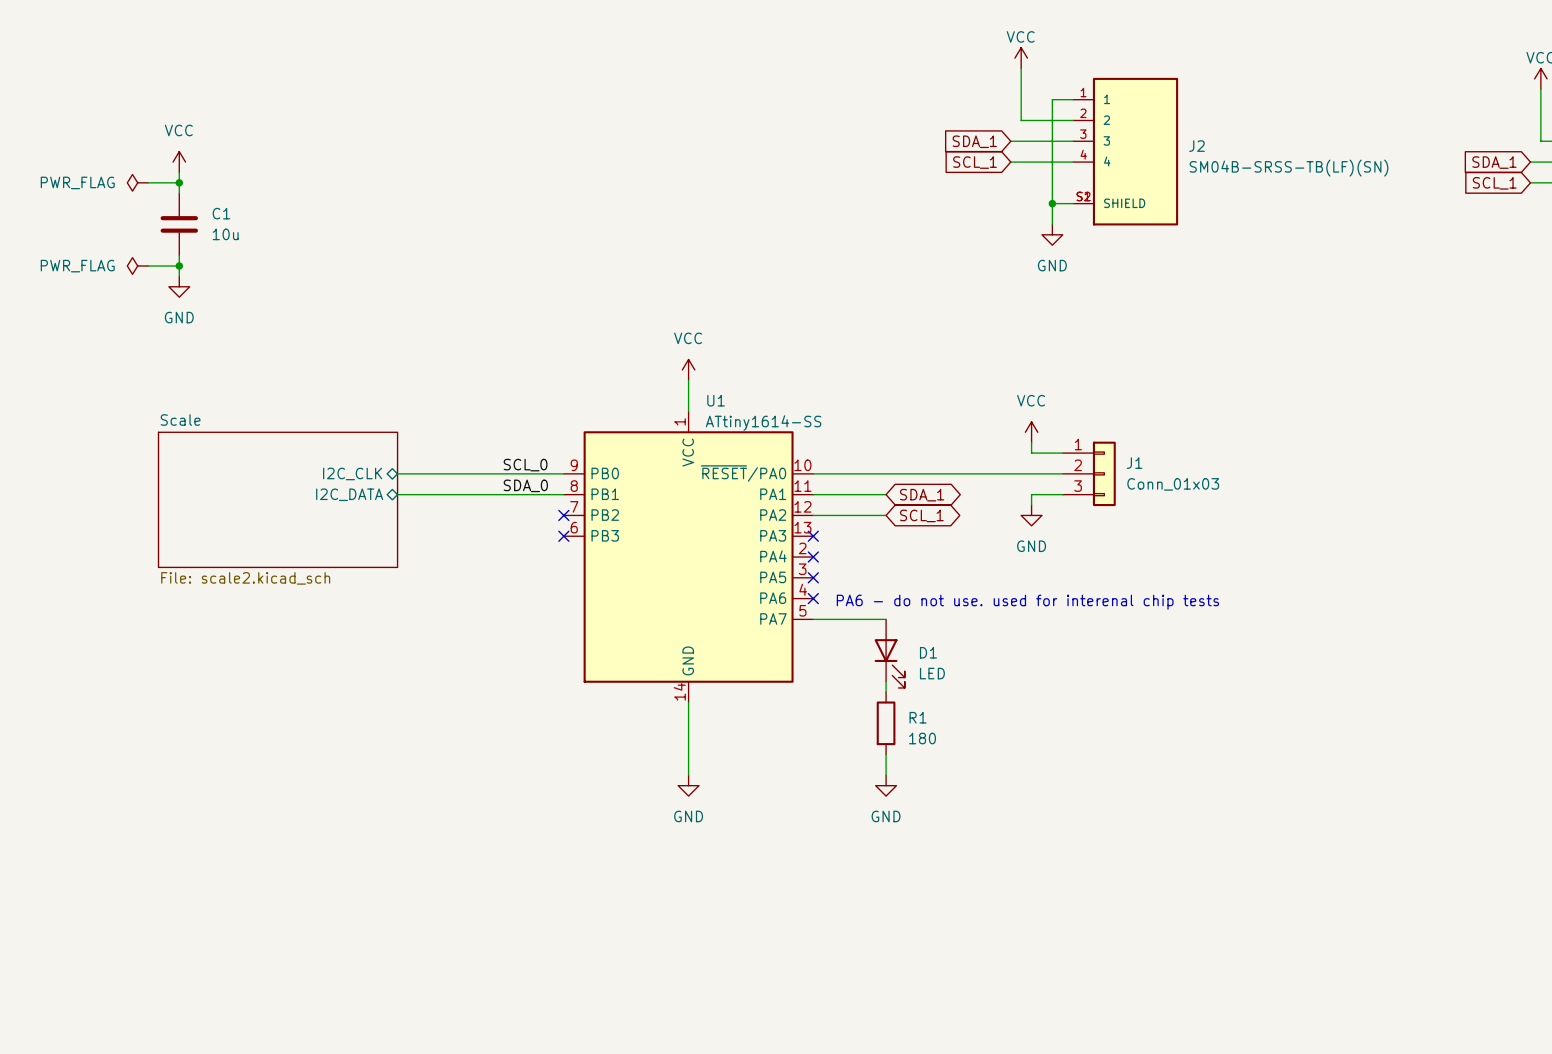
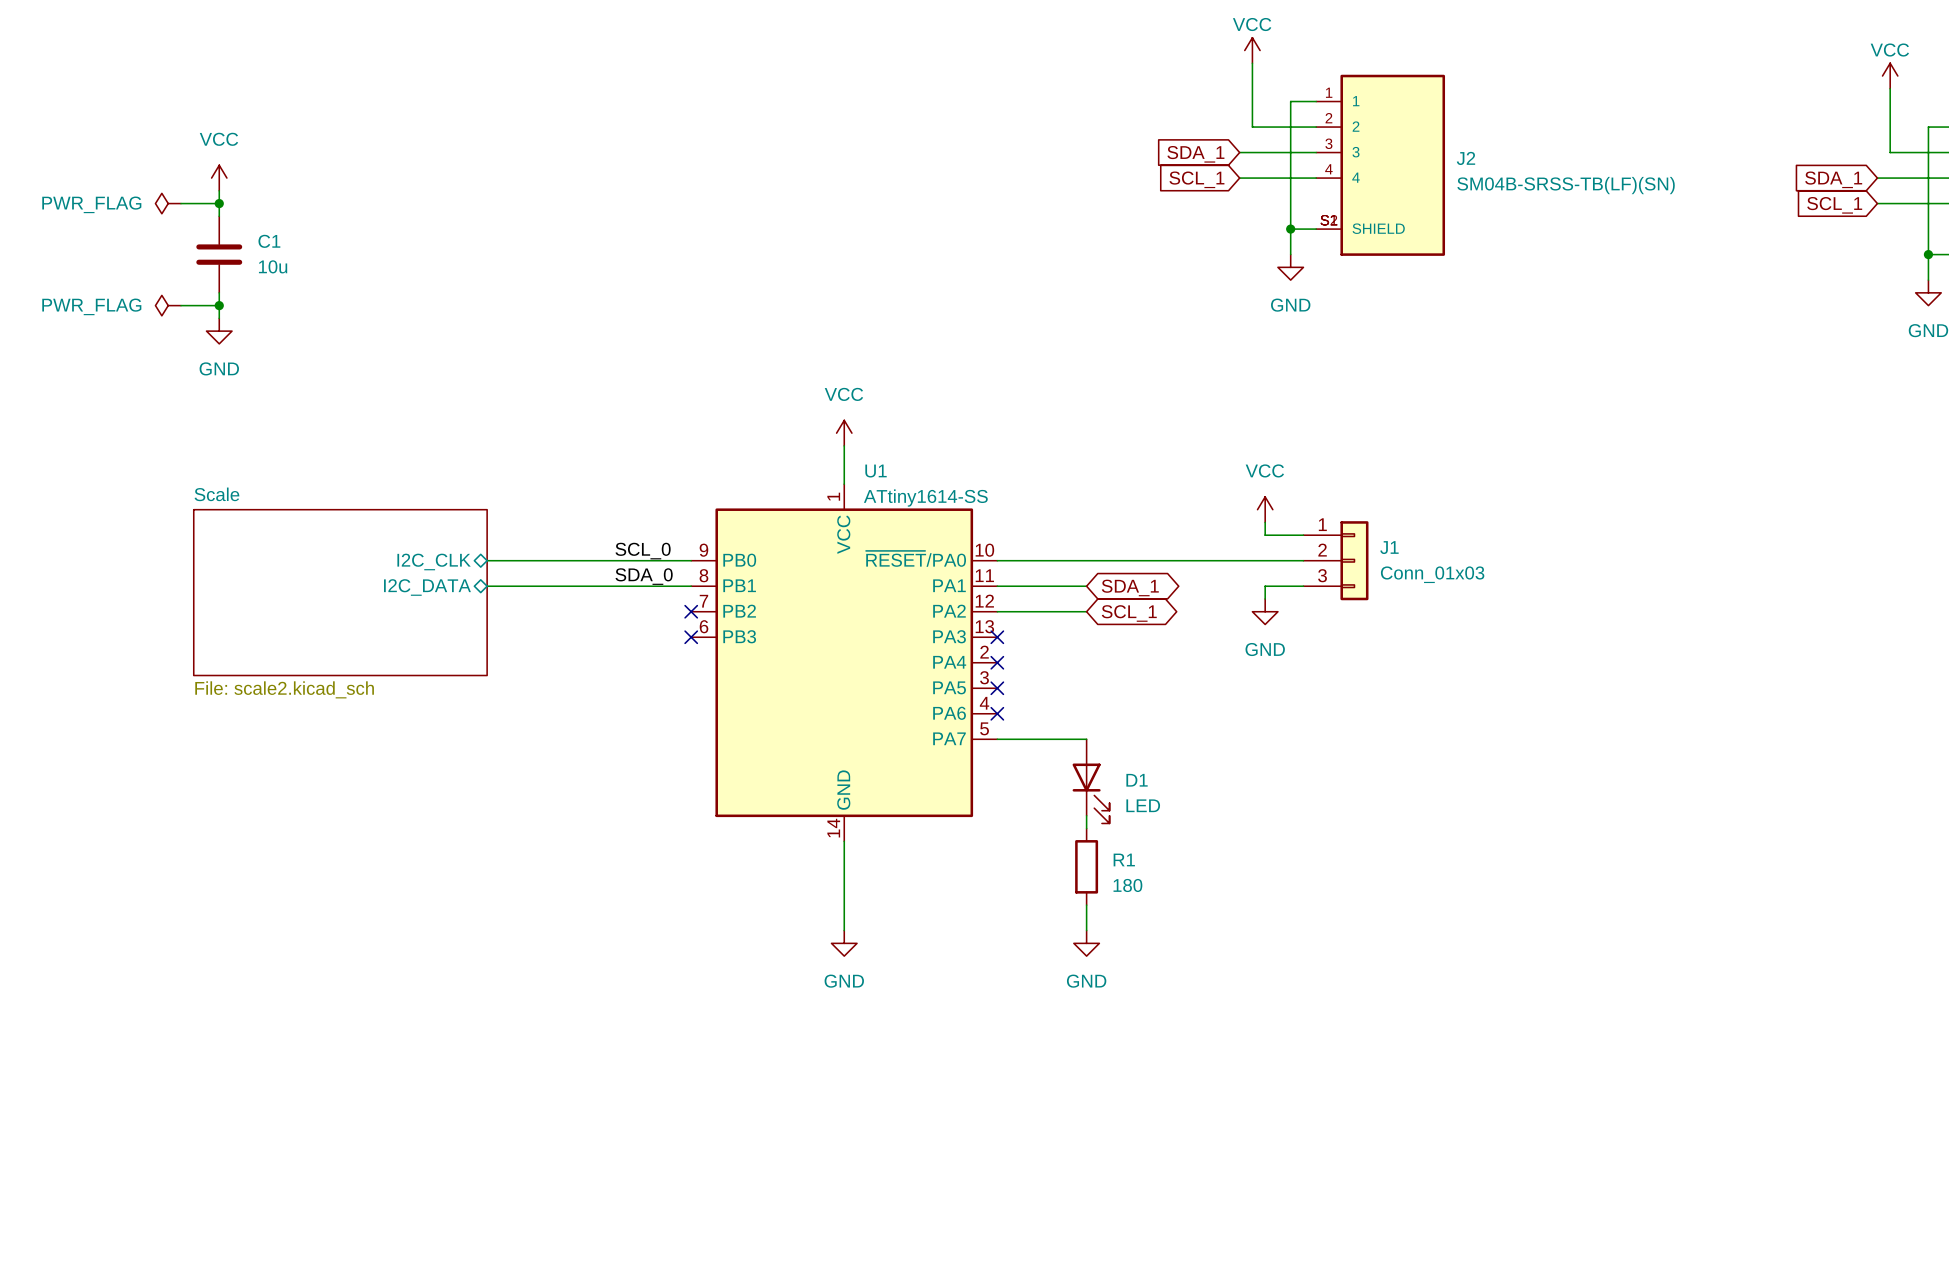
text: PA6 - do not use. used for interenal chip tests (1027, 602) -> none

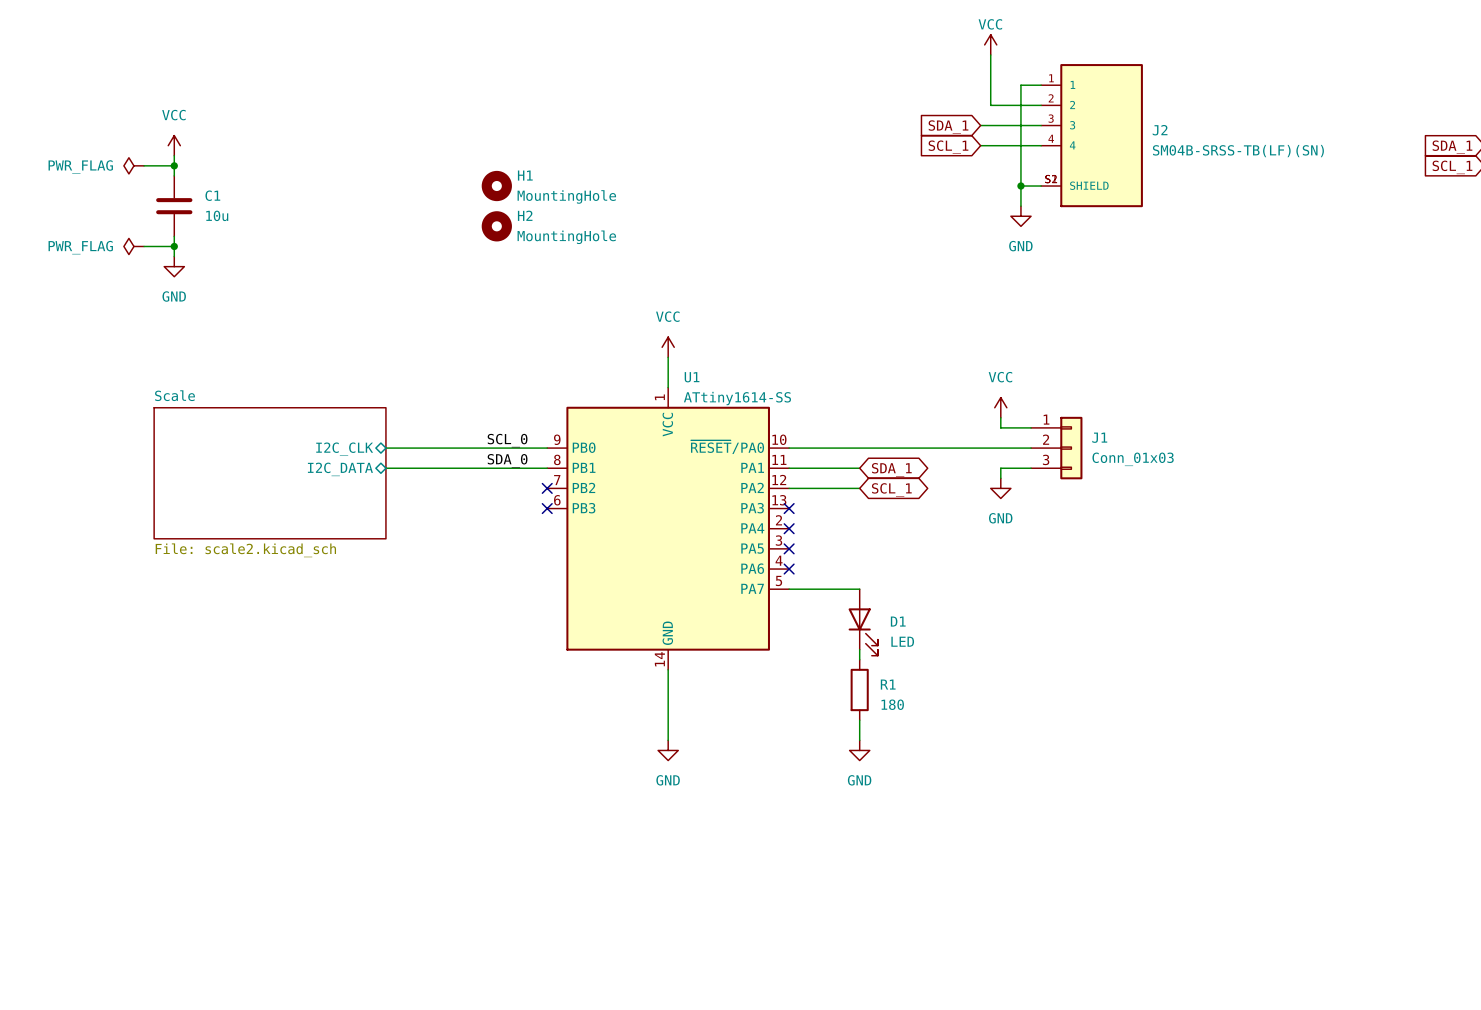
H1: none -> MountingHole (496, 186)
H2: none -> MountingHole (496, 226)

